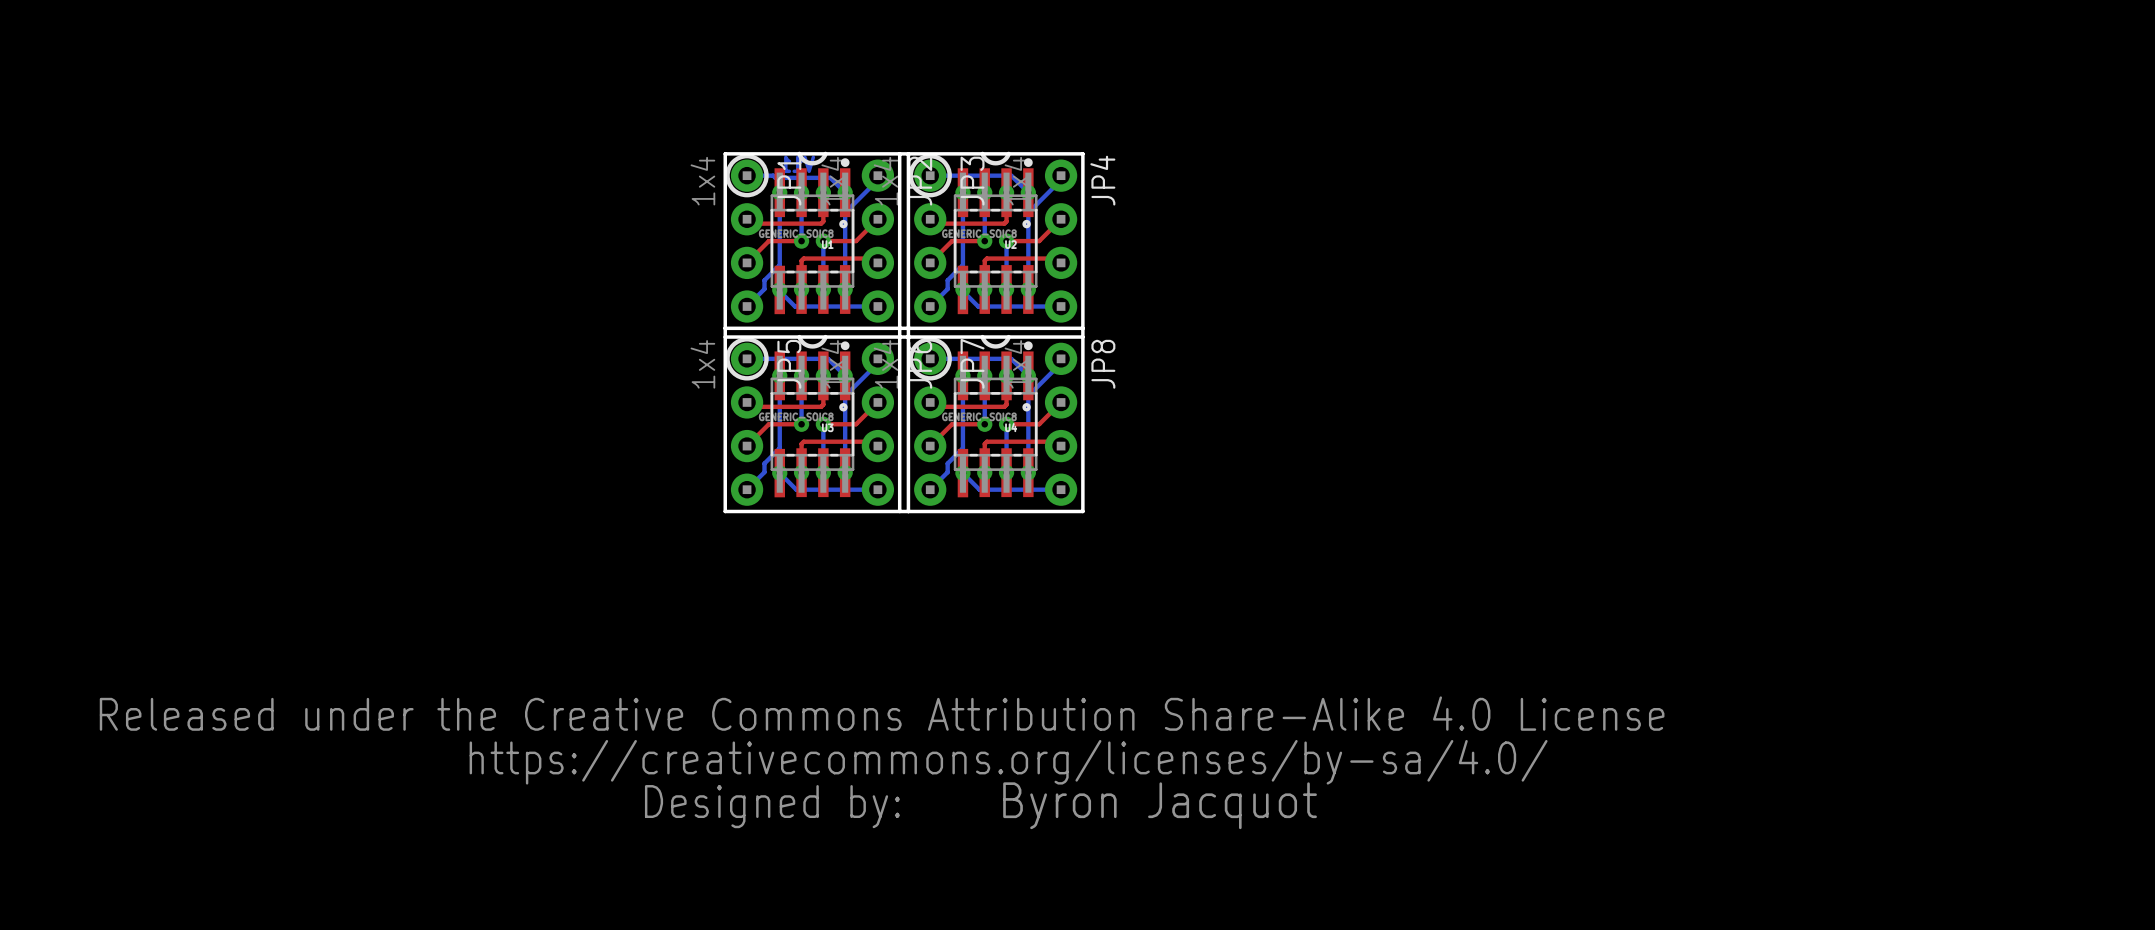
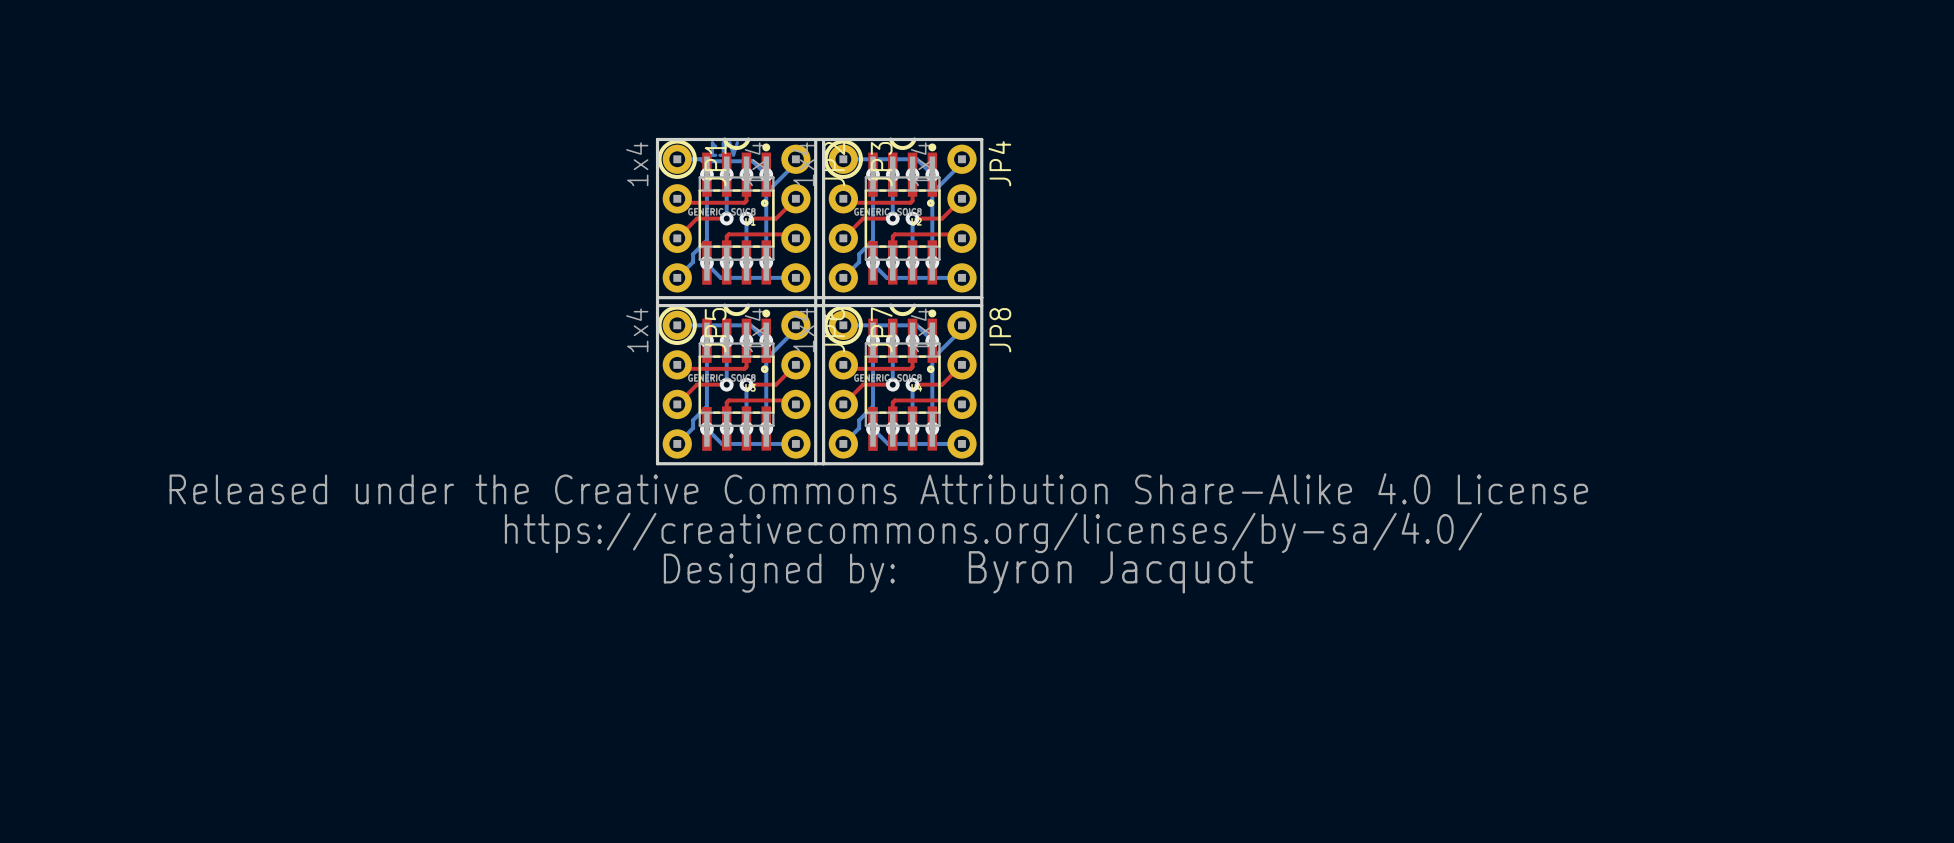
drawing position: (882, 762) -> (878, 532)
text position: Byron Jacquot (1160, 805) -> Byron Jacquot (1111, 572)

